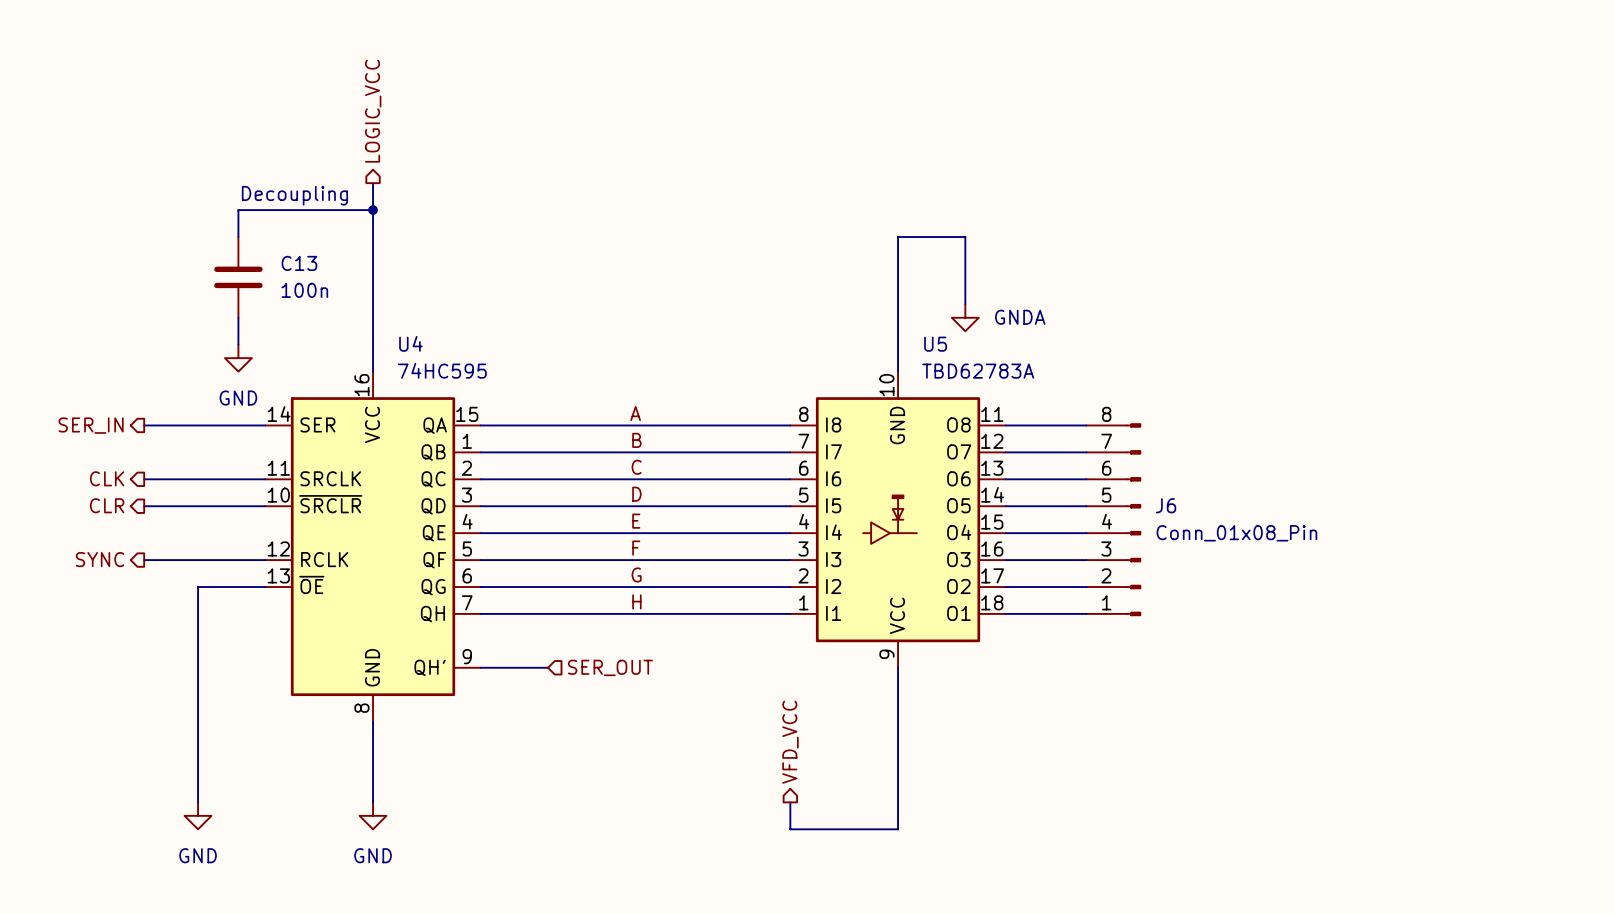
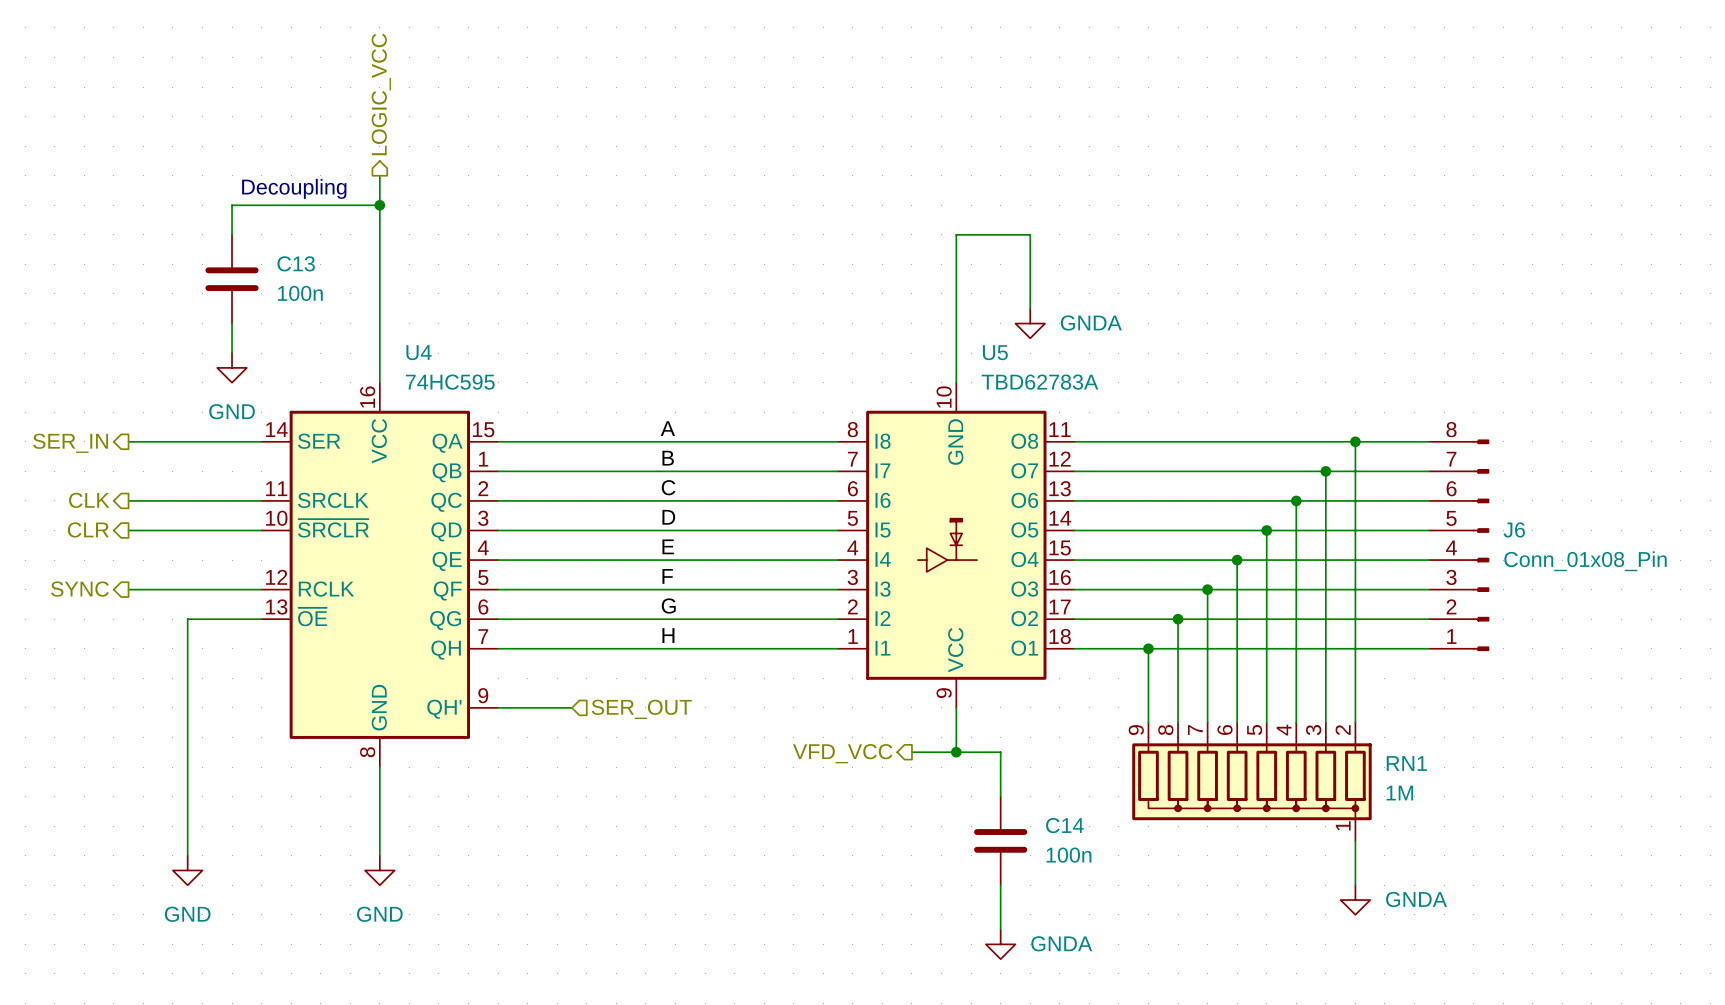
wire: none -> (1163, 441) (1429, 441)
wire: none -> (1355, 441) (1355, 722)
junction: none -> (1355, 441)
wire: none -> (1163, 471) (1429, 471)
wire: none -> (1325, 471) (1325, 722)
junction: none -> (1325, 471)
wire: none -> (1163, 500) (1429, 500)
wire: none -> (1296, 500) (1296, 722)
junction: none -> (1296, 500)
wire: none -> (1163, 530) (1429, 530)
wire: none -> (1266, 530) (1266, 722)
junction: none -> (1266, 530)
J6 position: (1113, 519) -> (1459, 545)
wire: none -> (1163, 560) (1429, 560)
wire: none -> (1237, 560) (1237, 722)
junction: none -> (1237, 560)
wire: none -> (1163, 589) (1429, 589)
wire: none -> (1207, 589) (1207, 722)
junction: none -> (1207, 589)
wire: none -> (1163, 619) (1429, 619)
wire: none -> (1178, 619) (1178, 722)
junction: none -> (1178, 619)
wire: none -> (1148, 648) (1148, 722)
junction: none -> (1148, 648)
wire: none -> (1163, 648) (1429, 648)
wire: none -> (911, 752) (1000, 752) (1000, 796)
wire: (898, 708) (898, 829) (790, 829) (790, 802) -> none
junction: none -> (956, 752)
RN1: none -> 1M (1251, 781)
hierarchical label rotation: 0° (790, 742) -> 90° counterclockwise (842, 753)
C14: none -> 100n (1000, 840)
wire: none -> (1355, 840) (1355, 885)
wire: none -> (1000, 885) (1000, 929)
power symbol: none -> GNDA (1355, 900)
power symbol: none -> GNDA (1000, 944)

